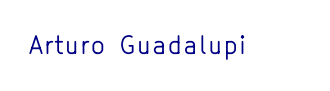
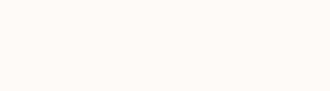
text: Arturo Guadalupi (136, 47) -> none

